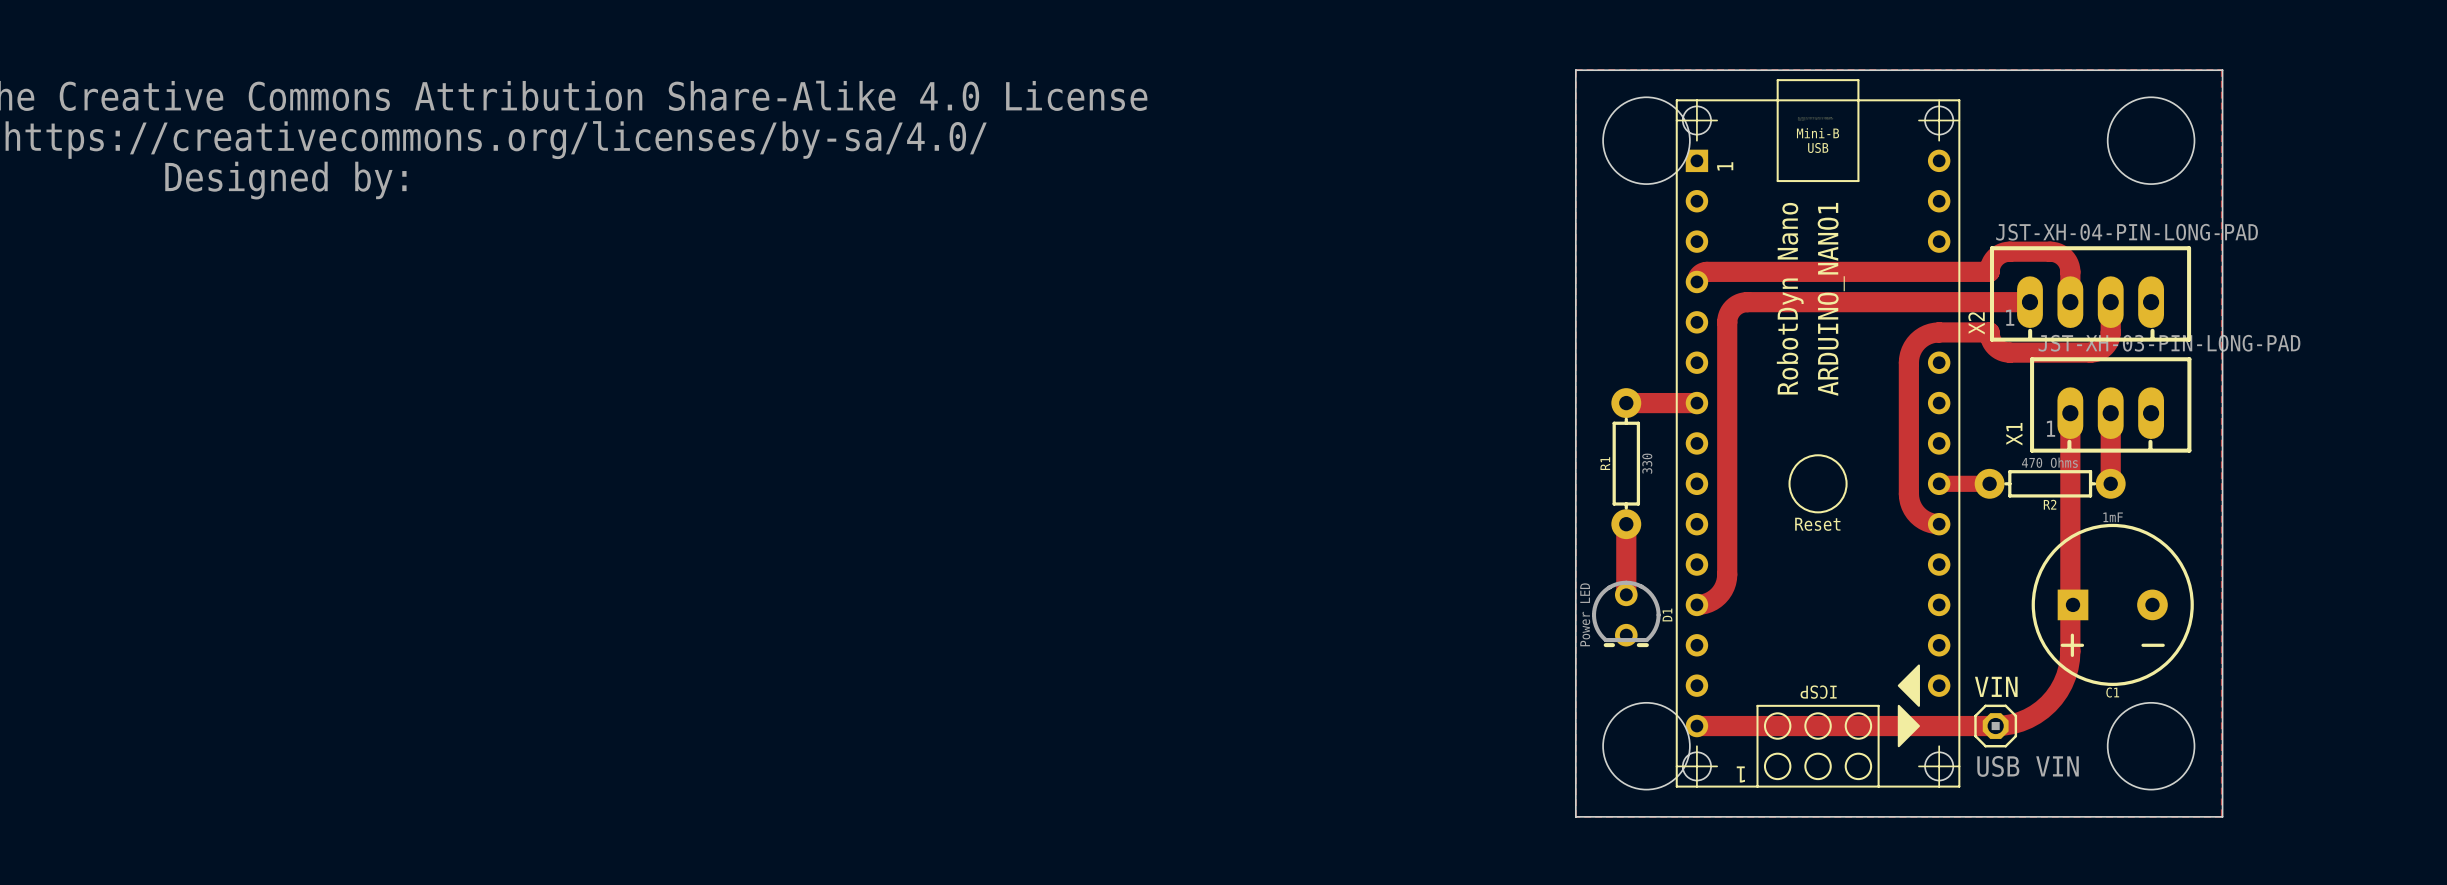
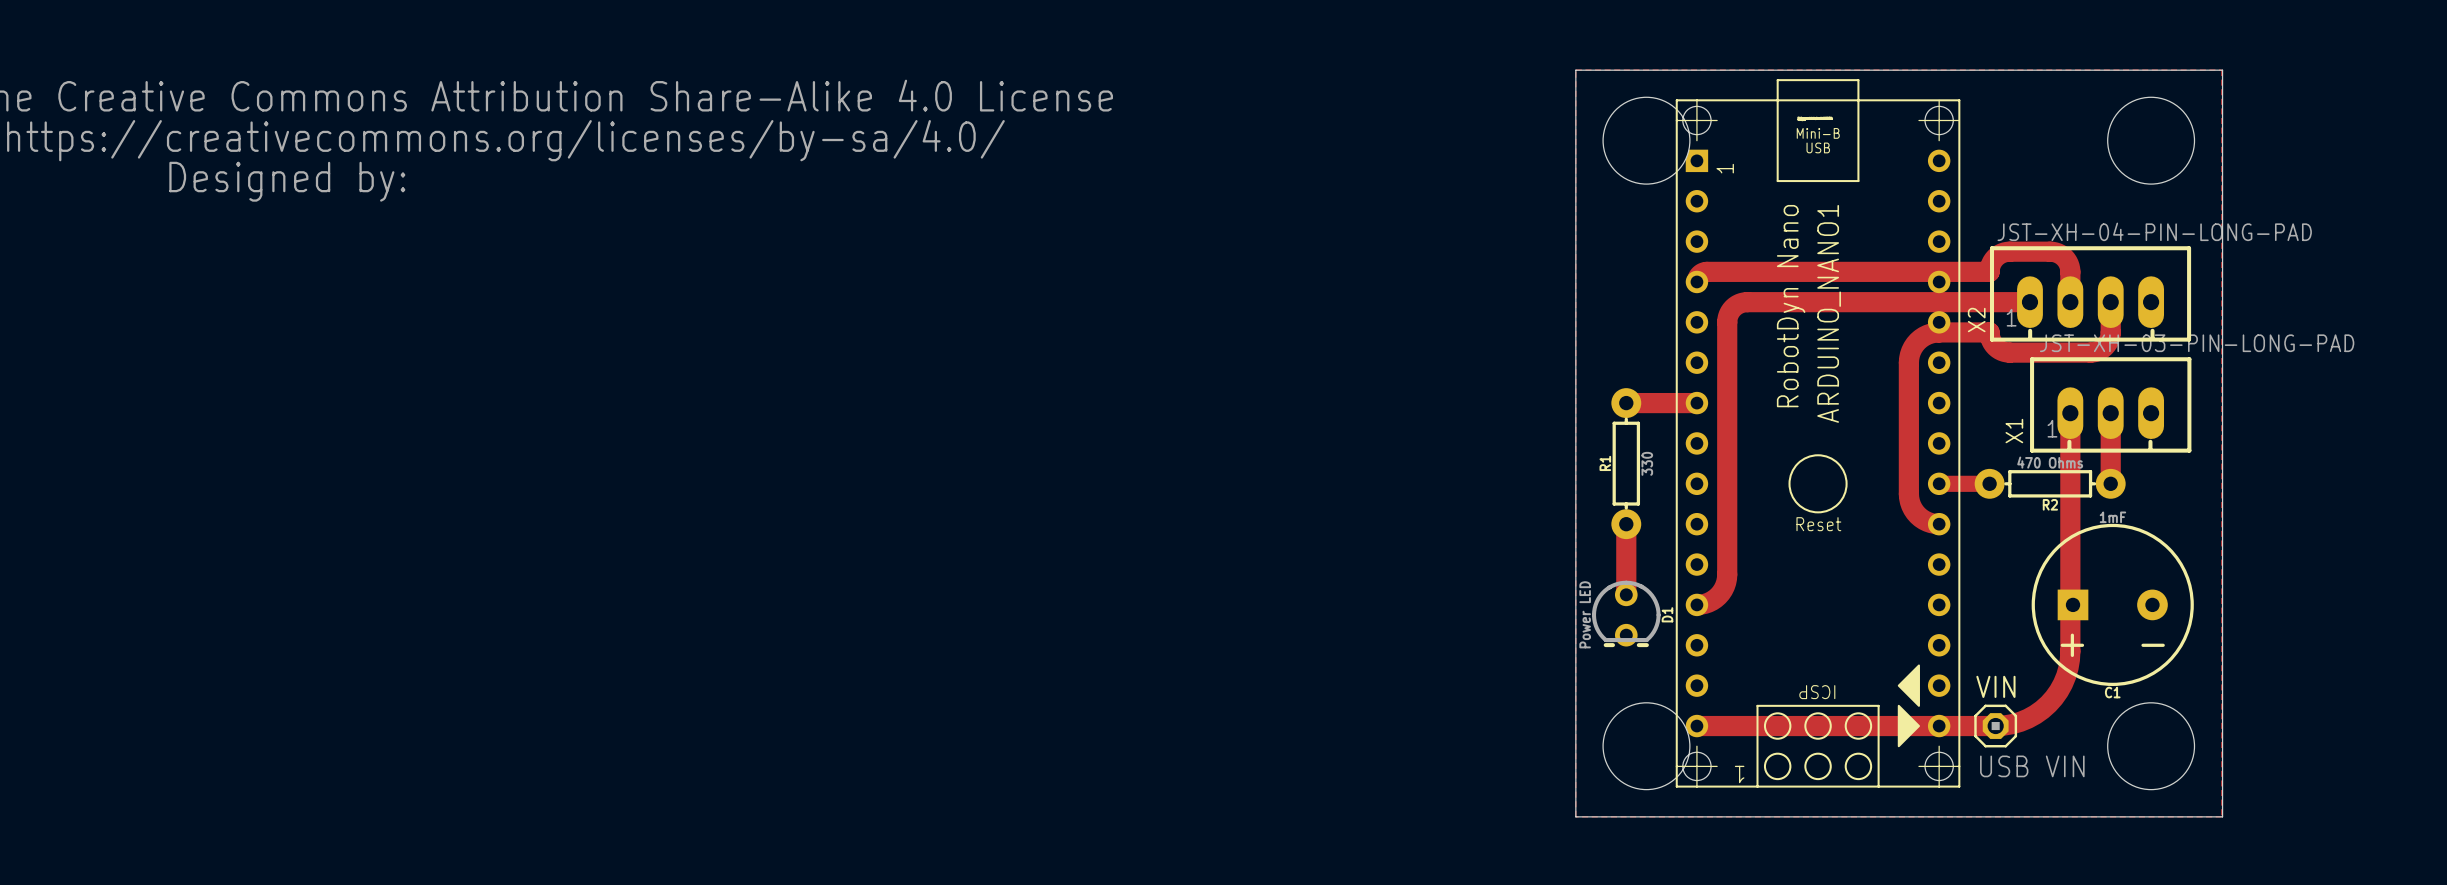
ARDUINO_NANO1 footprint: [1675, 79, 1961, 788] -> [1675, 79, 1961, 788]

